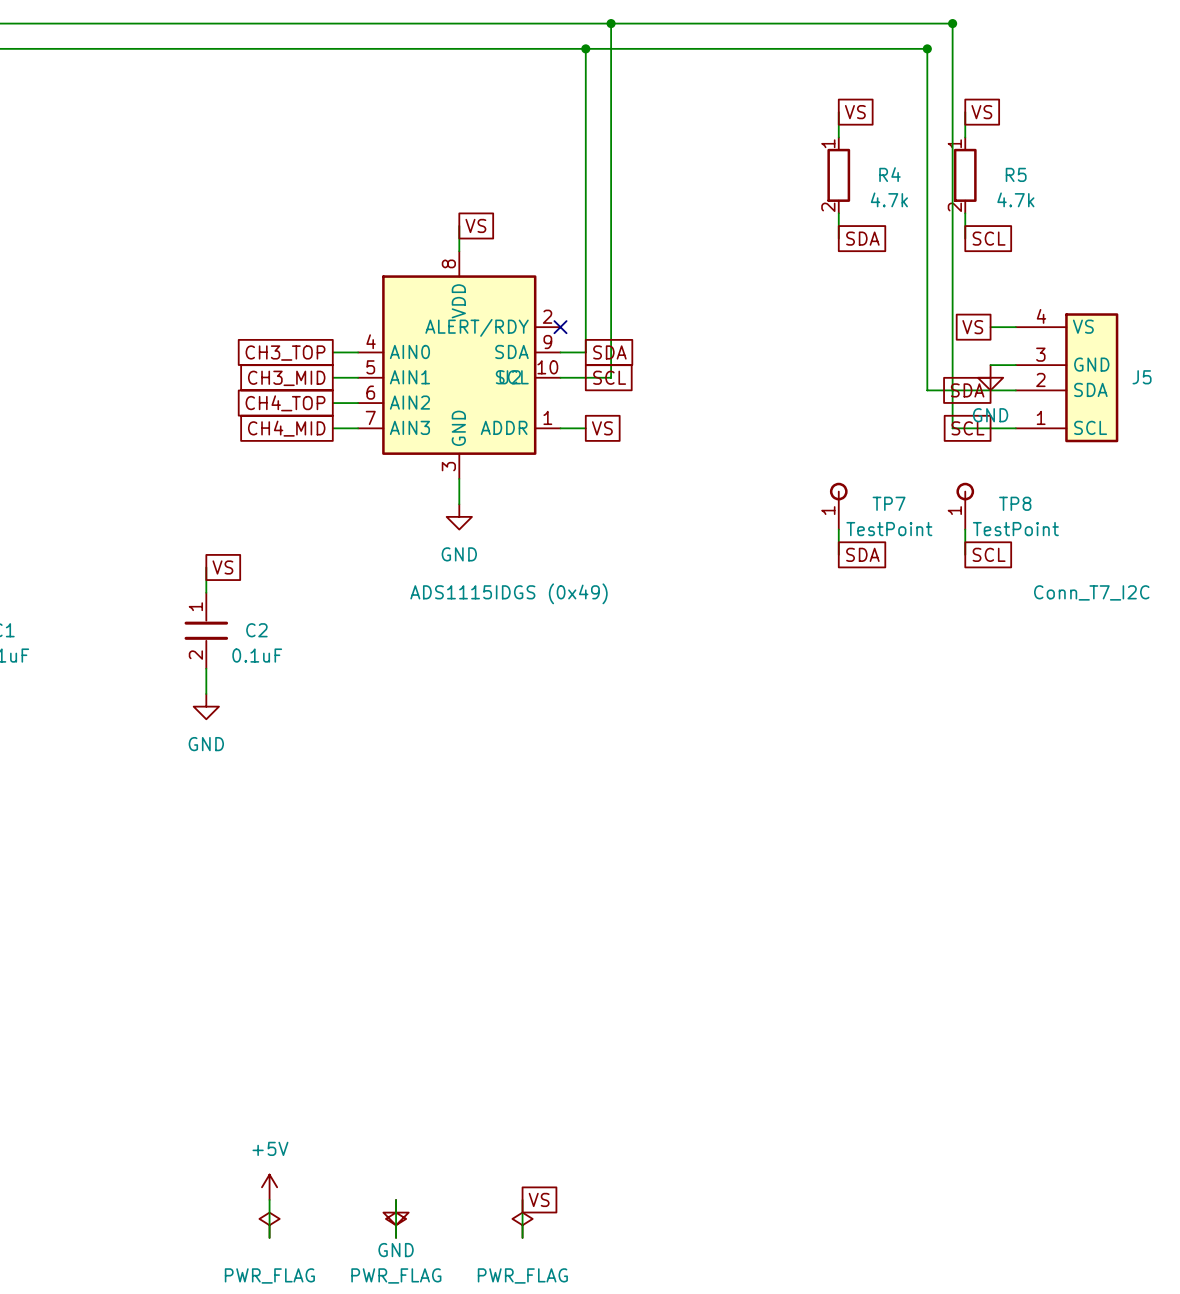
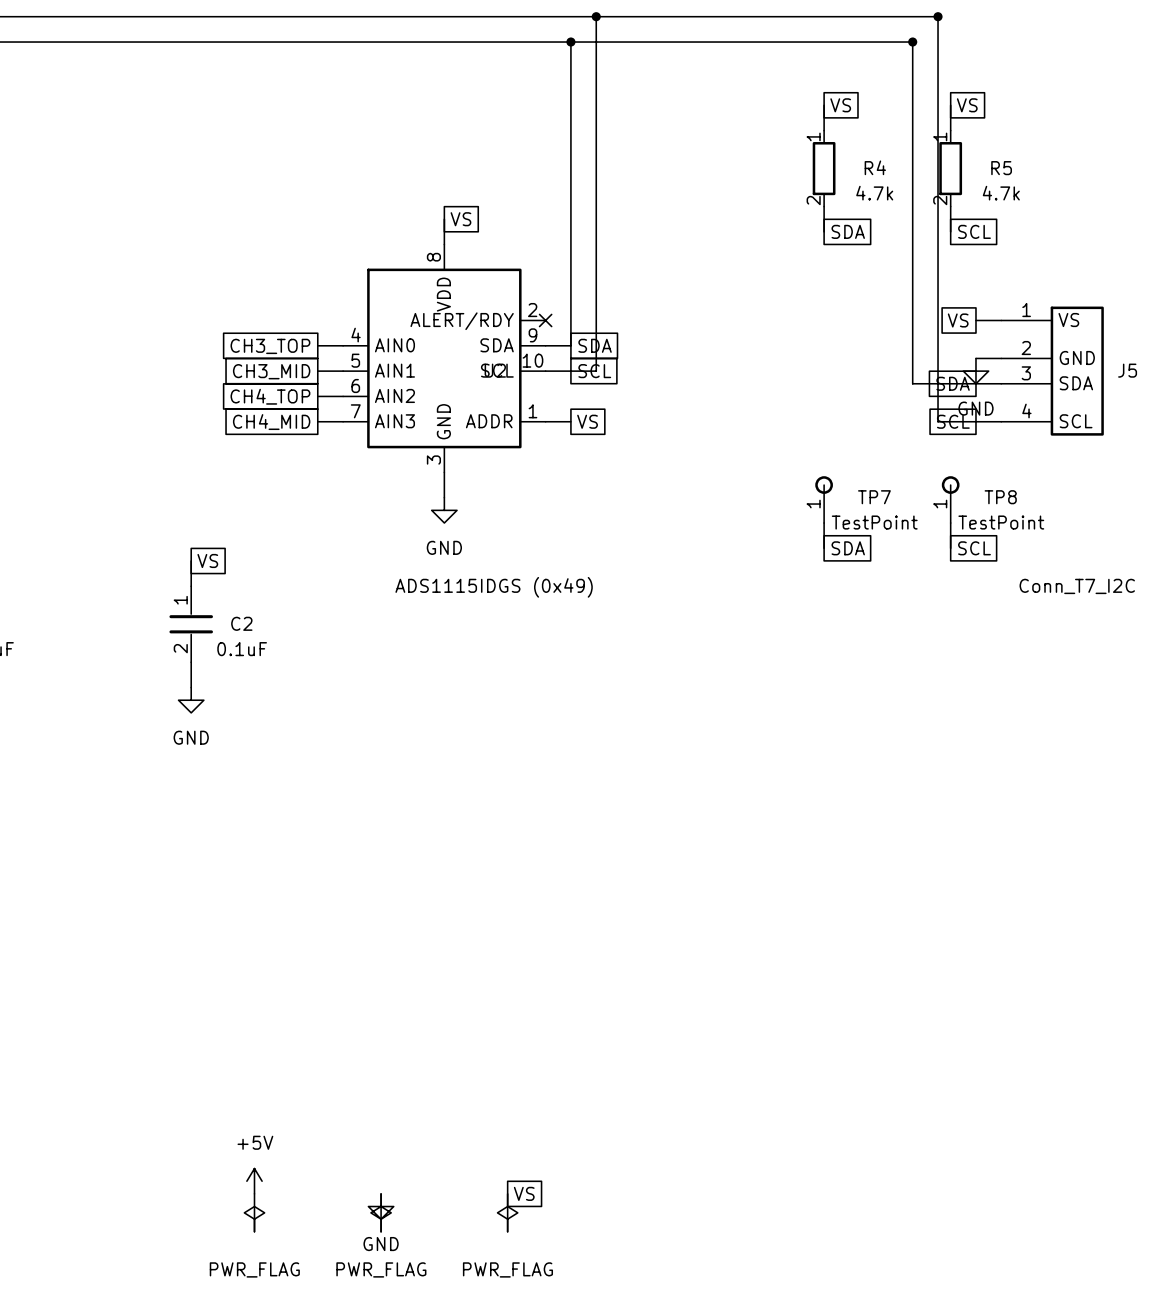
J5 pin number: 4 (1041, 316) -> 1 (1026, 310)
J5 pin number: 3 (1040, 354) -> 2 (1026, 348)
J5 pin number: 2 (1040, 379) -> 3 (1026, 373)
J5 pin number: 1 (1041, 417) -> 4 (1026, 411)

